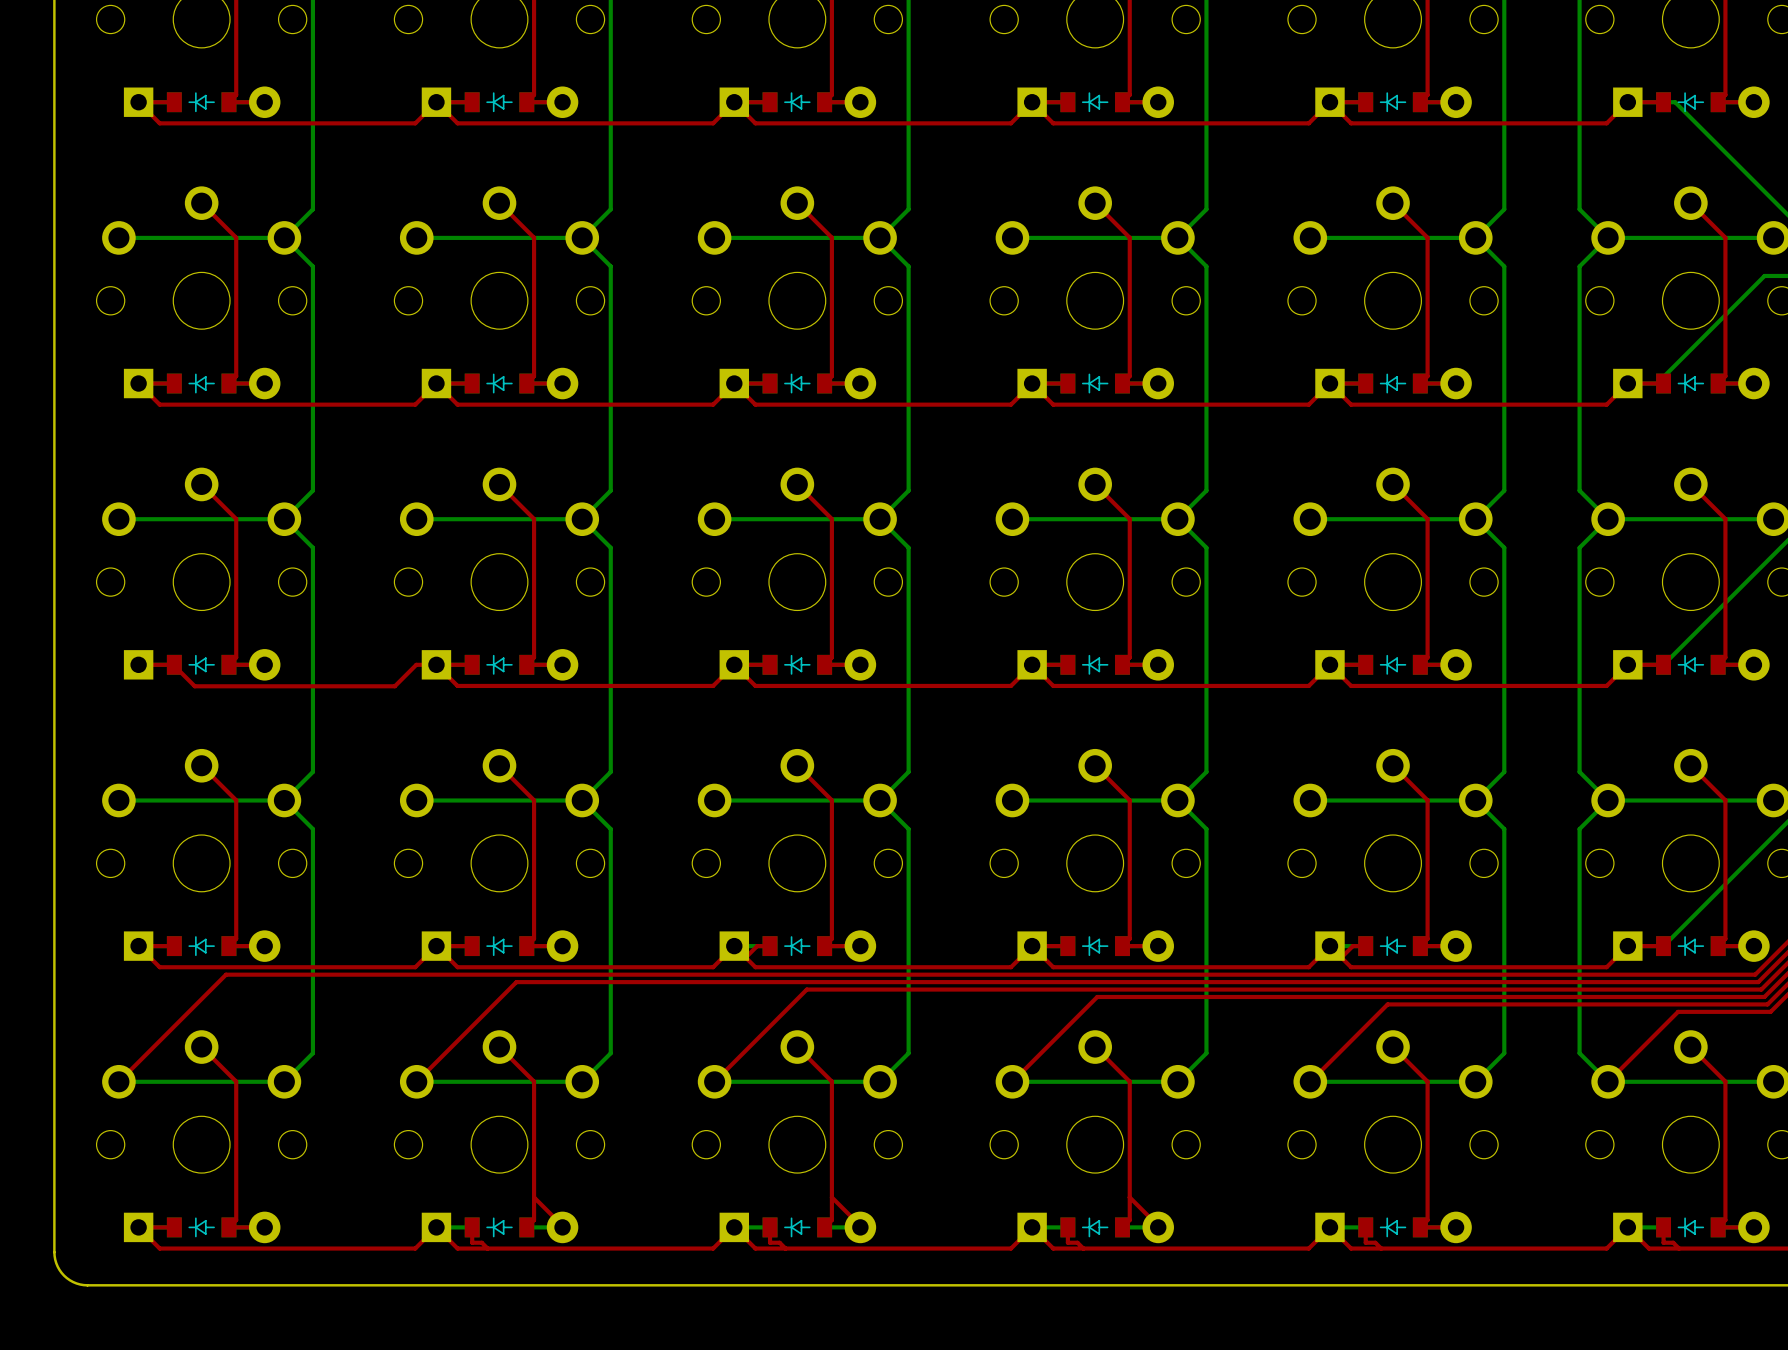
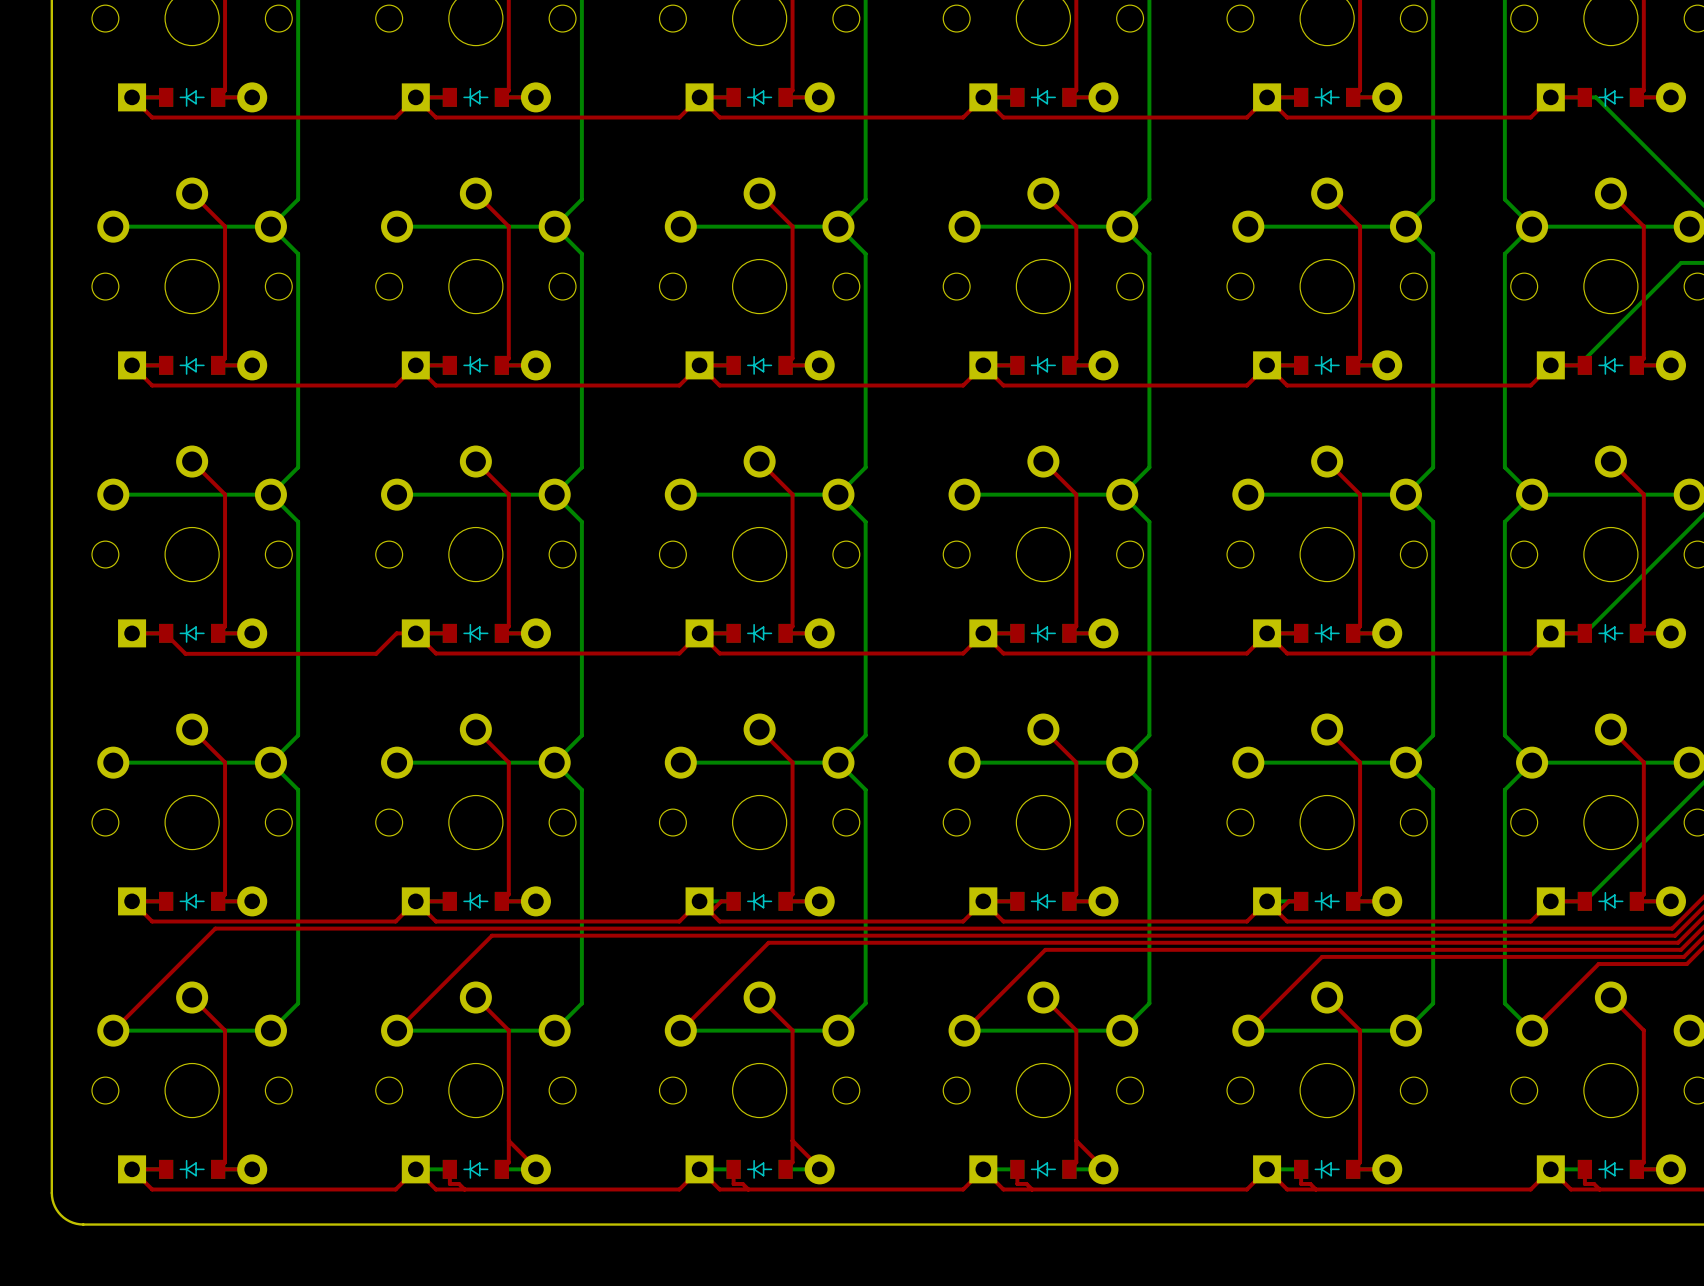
bottom track: (1608, 1081) (1773, 1081) -> none

